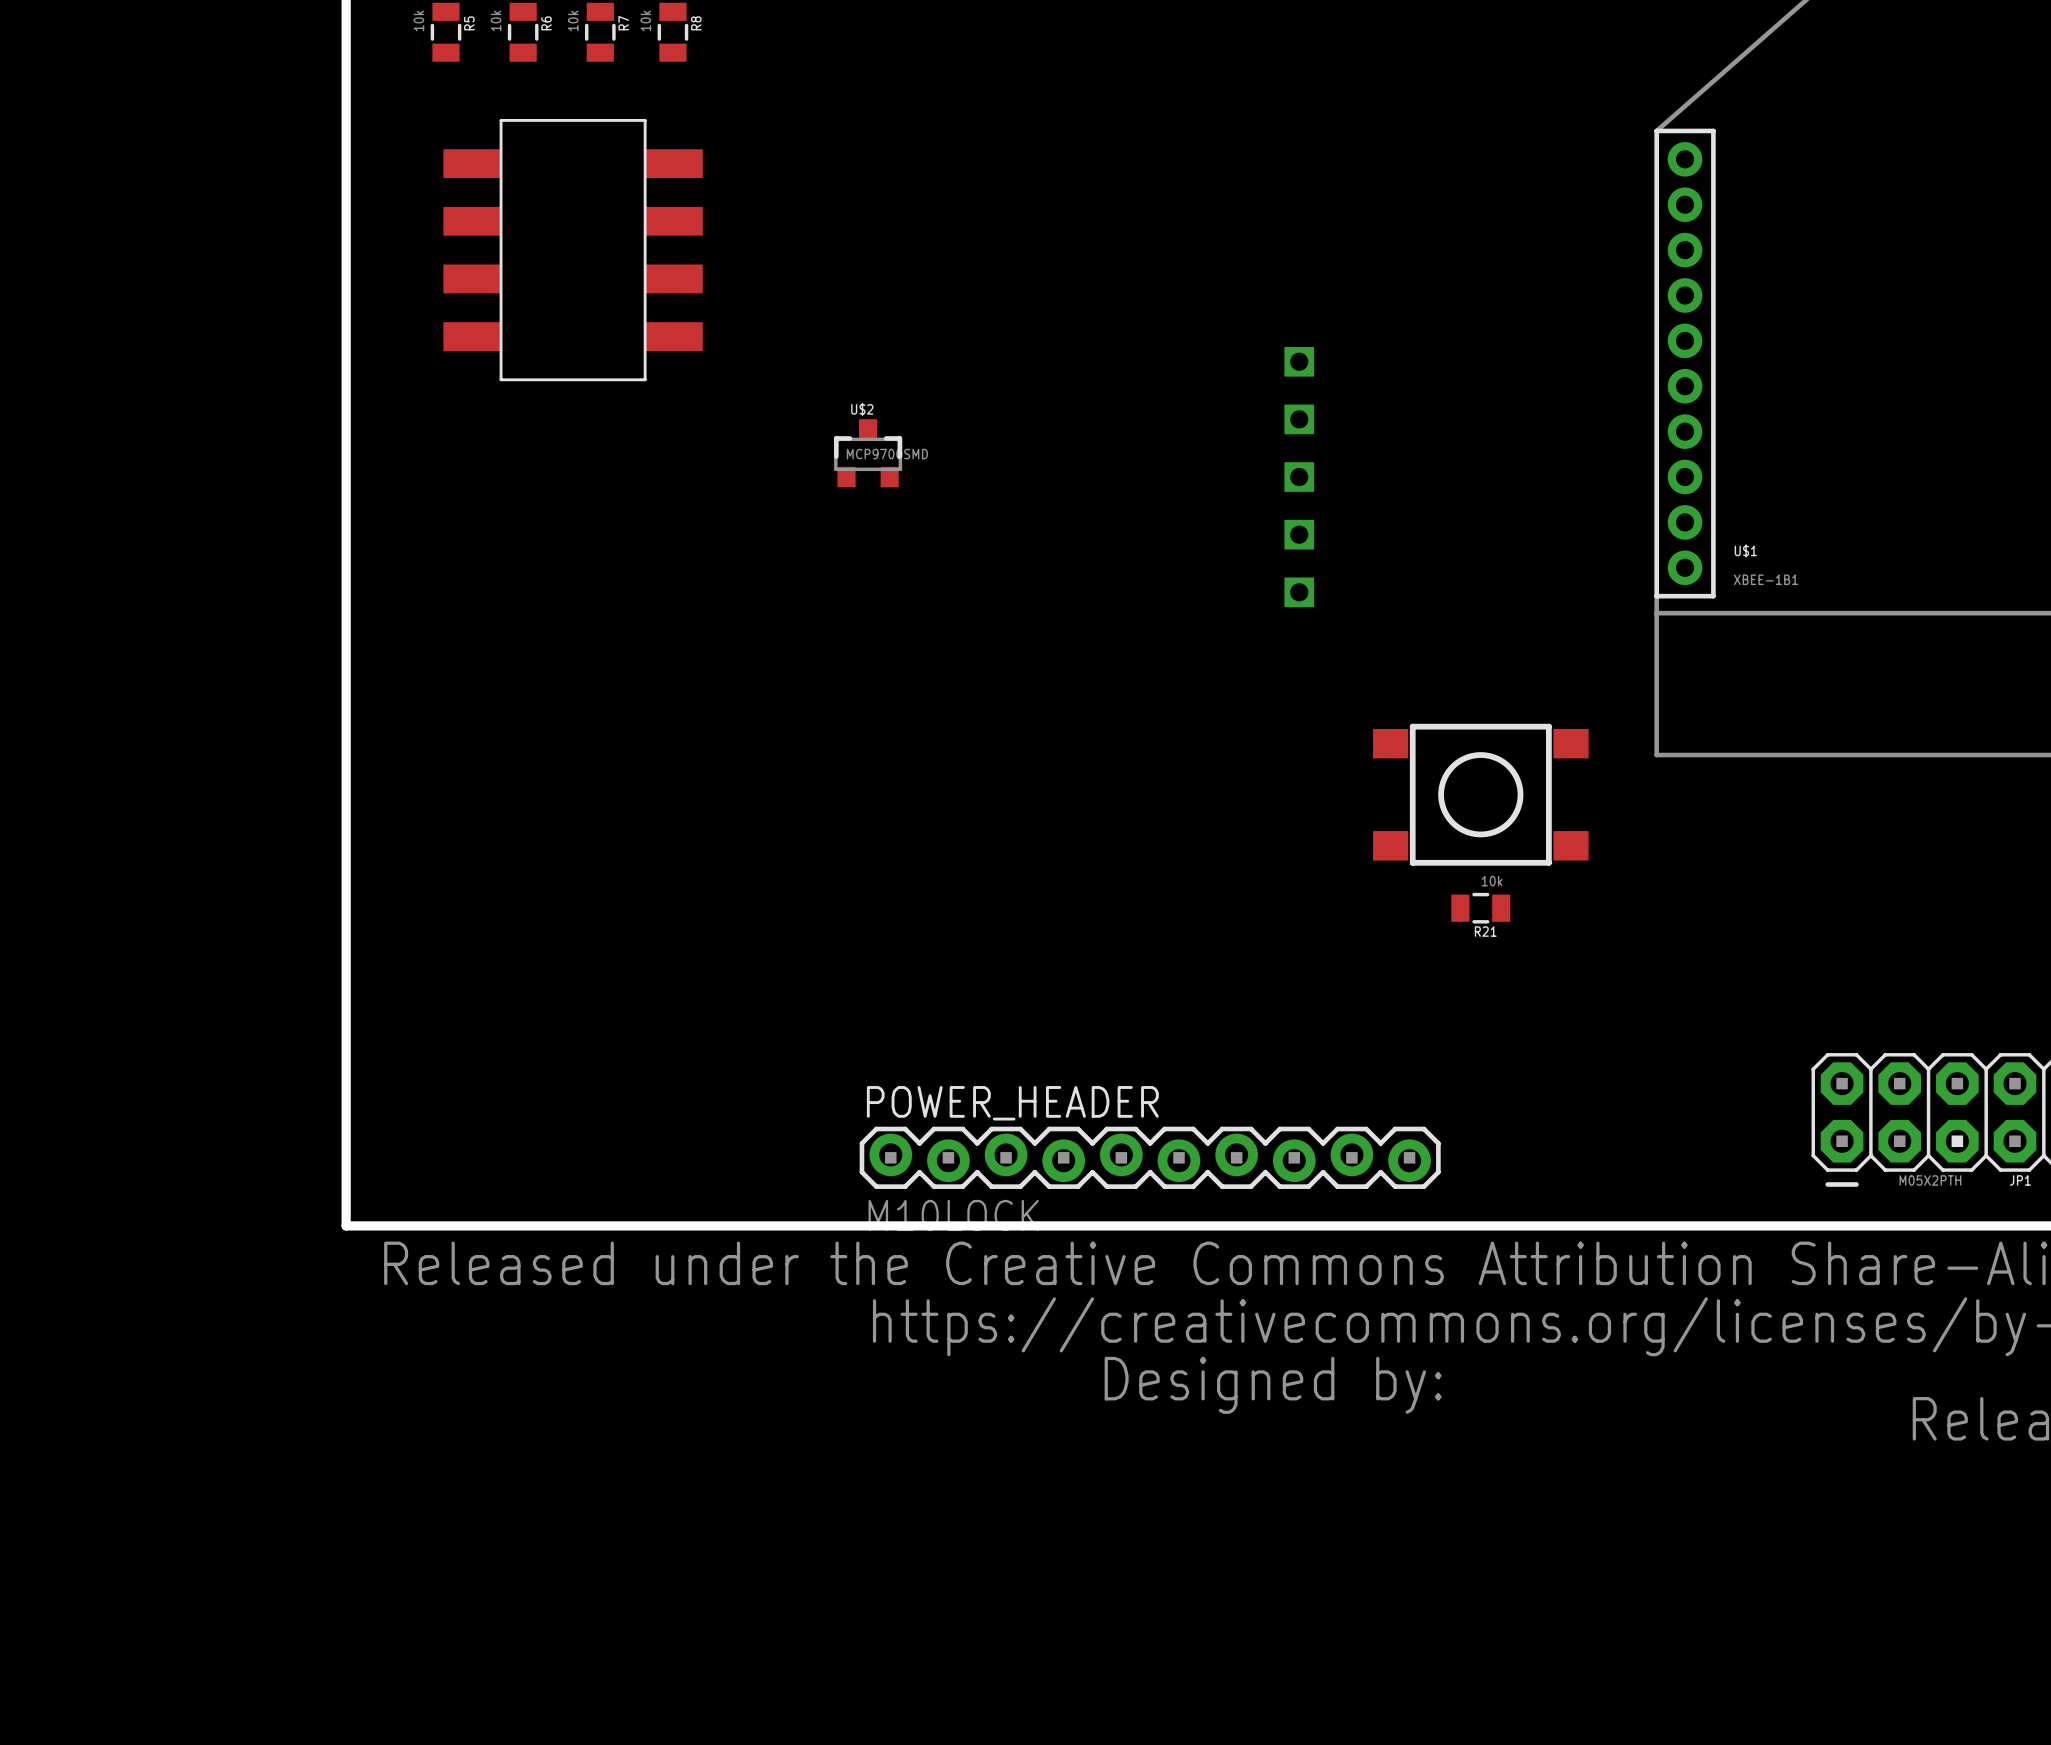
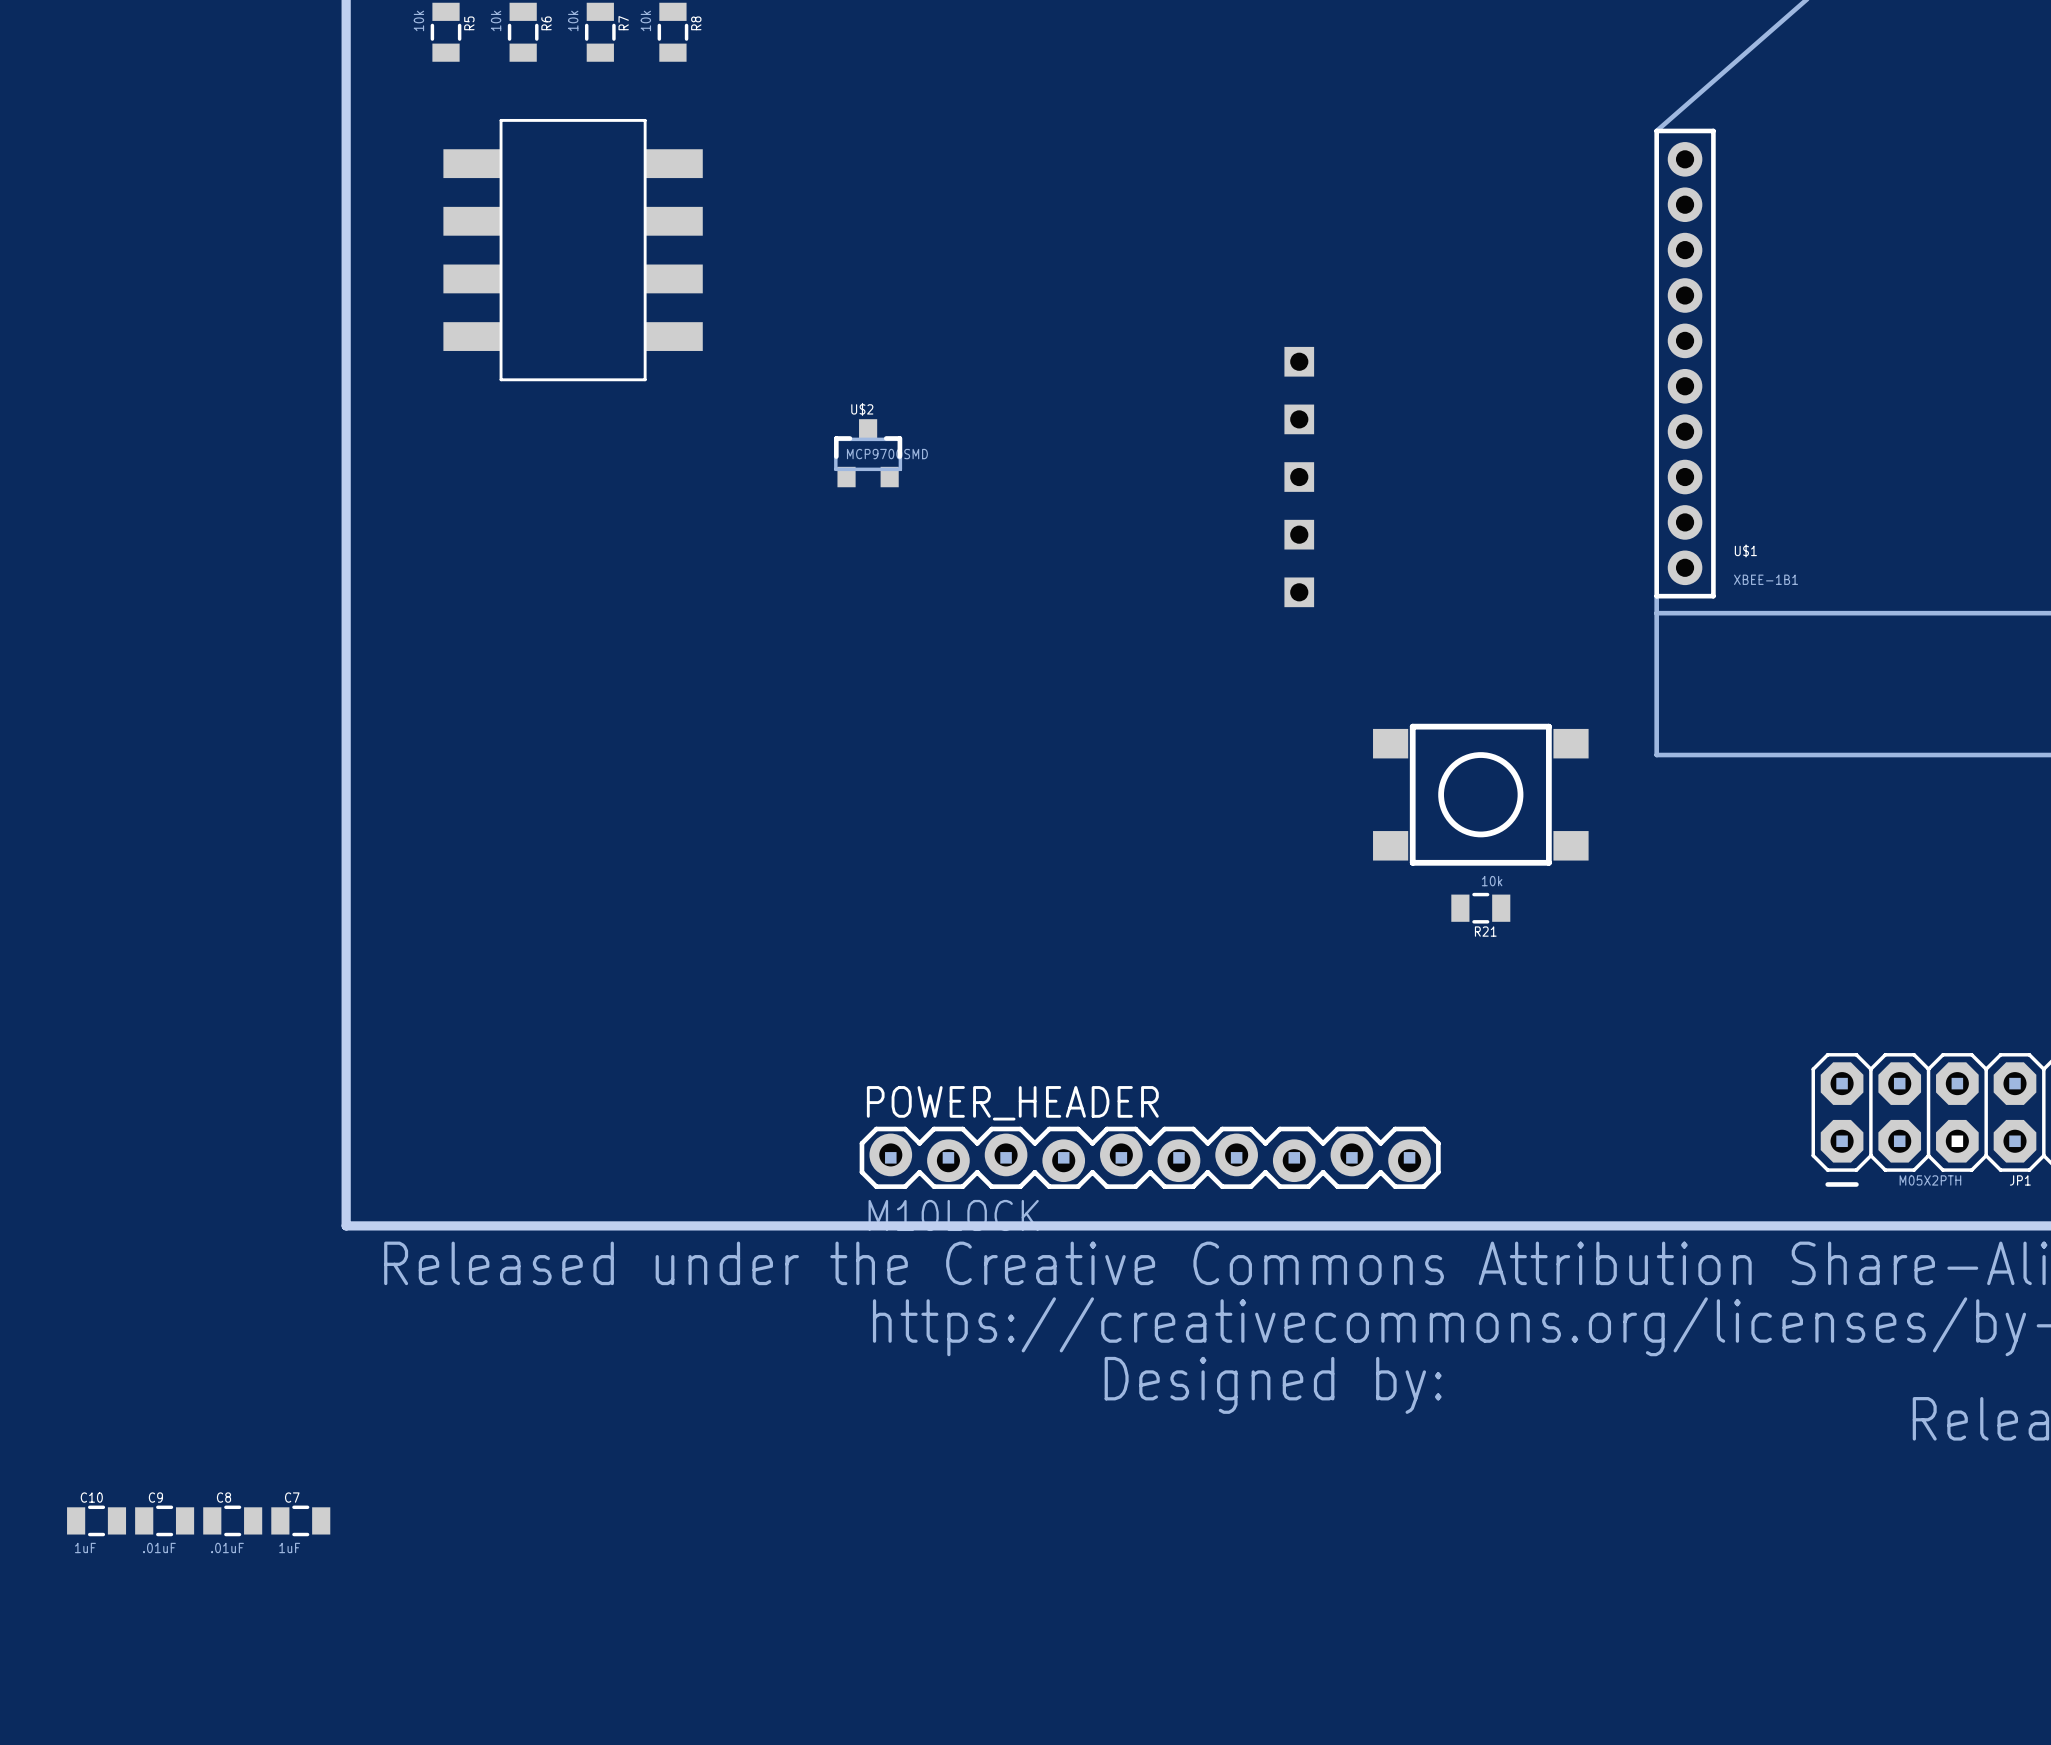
C10: none -> 1uF (96, 1520)
C9: none -> .01uF (164, 1520)
C8: none -> .01uF (232, 1520)
C7: none -> 1uF (300, 1520)

